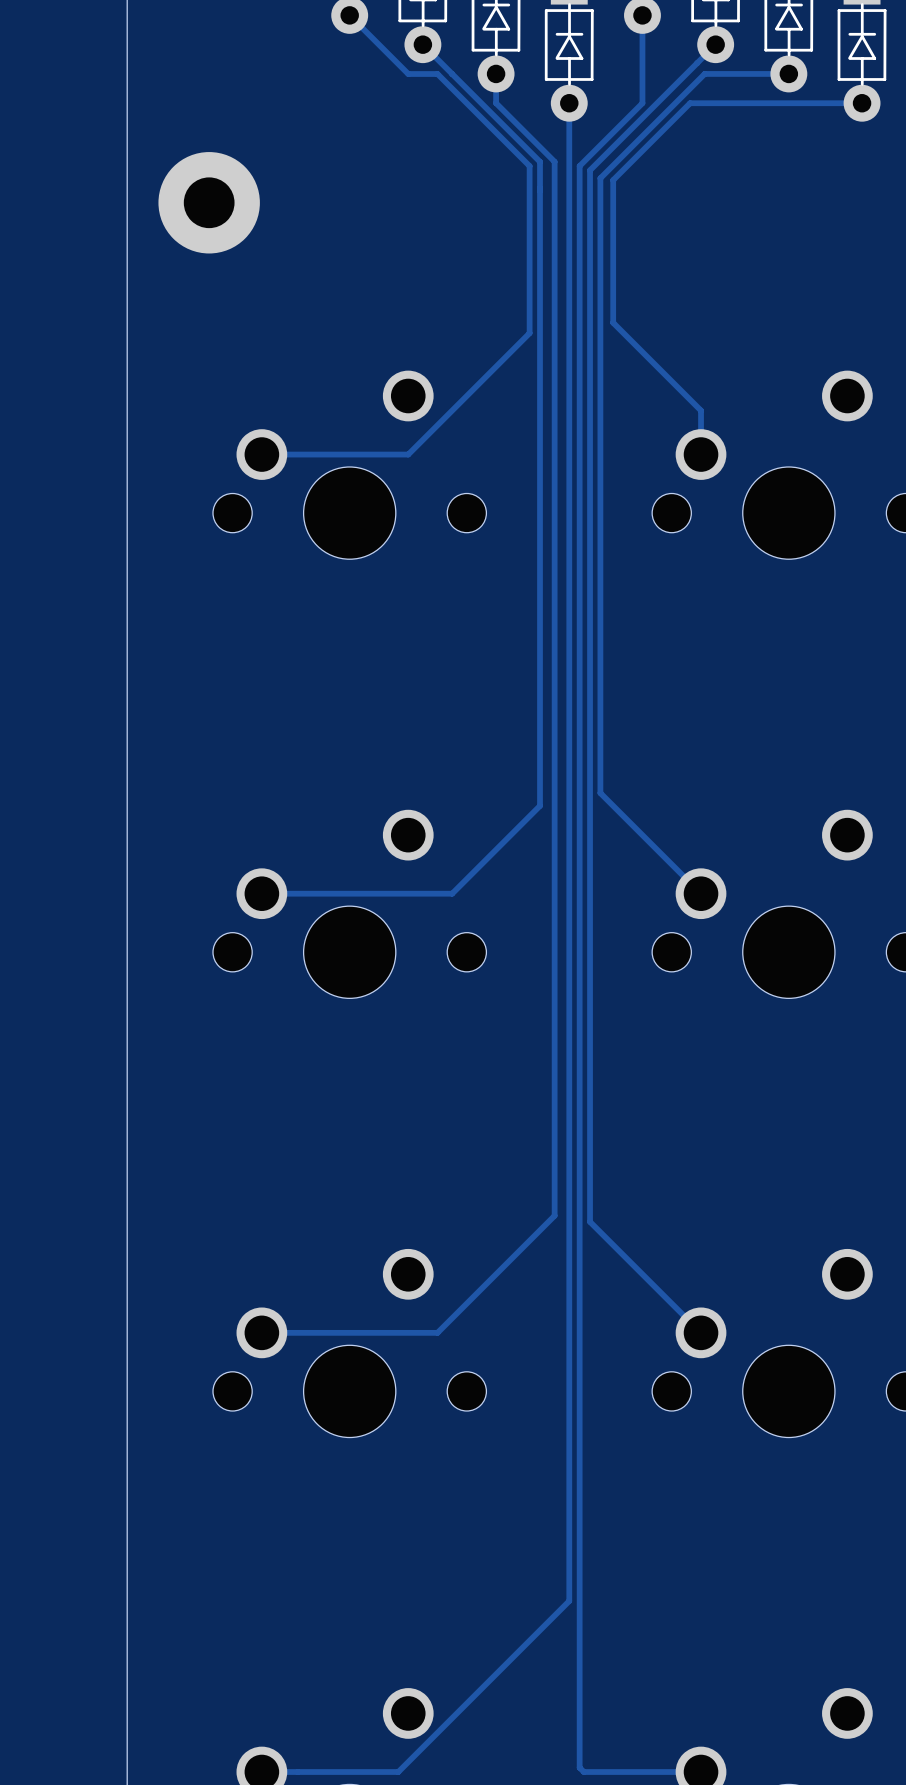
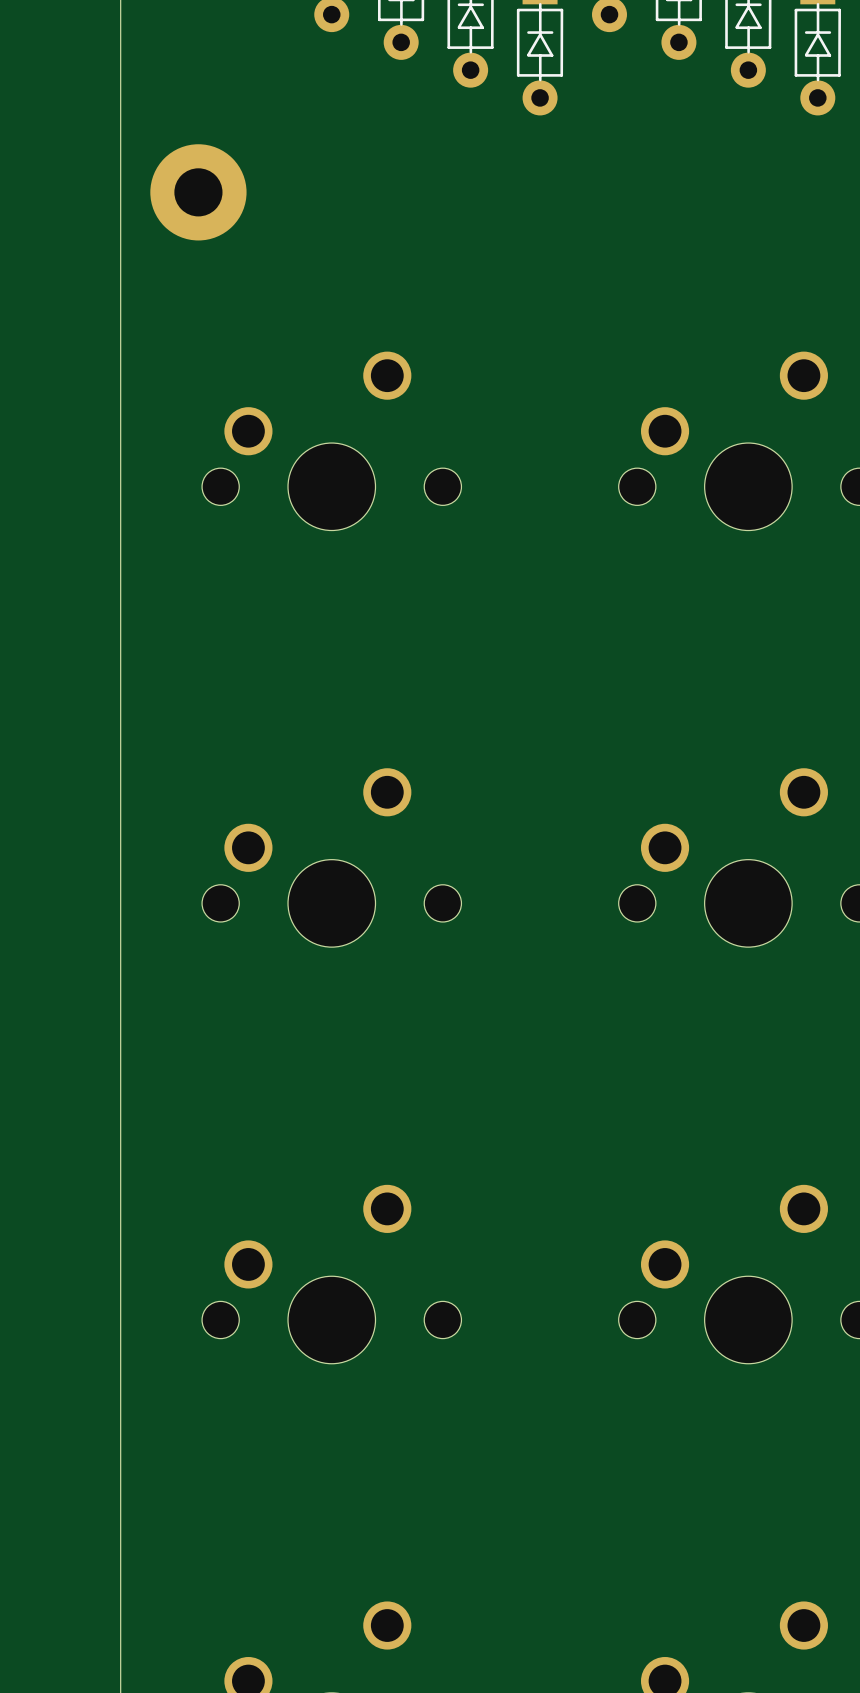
track: (349, 15) (408, 74) (437, 74) (529, 166) (529, 333) (408, 454) (261, 454) -> none
track: (642, 15) (642, 103) (579, 166) (579, 1767) (583, 1772) (701, 1772) -> none
track: (422, 44) (540, 161) (540, 805) (452, 893) (261, 893) -> none
track: (715, 44) (590, 170) (590, 1221) (701, 1332) -> none
track: (496, 73) (496, 103) (554, 161) (554, 1215) (437, 1332) (261, 1332) -> none
track: (788, 73) (704, 73) (600, 178) (600, 793) (701, 893) -> none
track: (569, 103) (569, 1601) (398, 1772) (261, 1772) -> none
track: (862, 103) (690, 103) (613, 180) (613, 322) (701, 410) (701, 454) -> none

